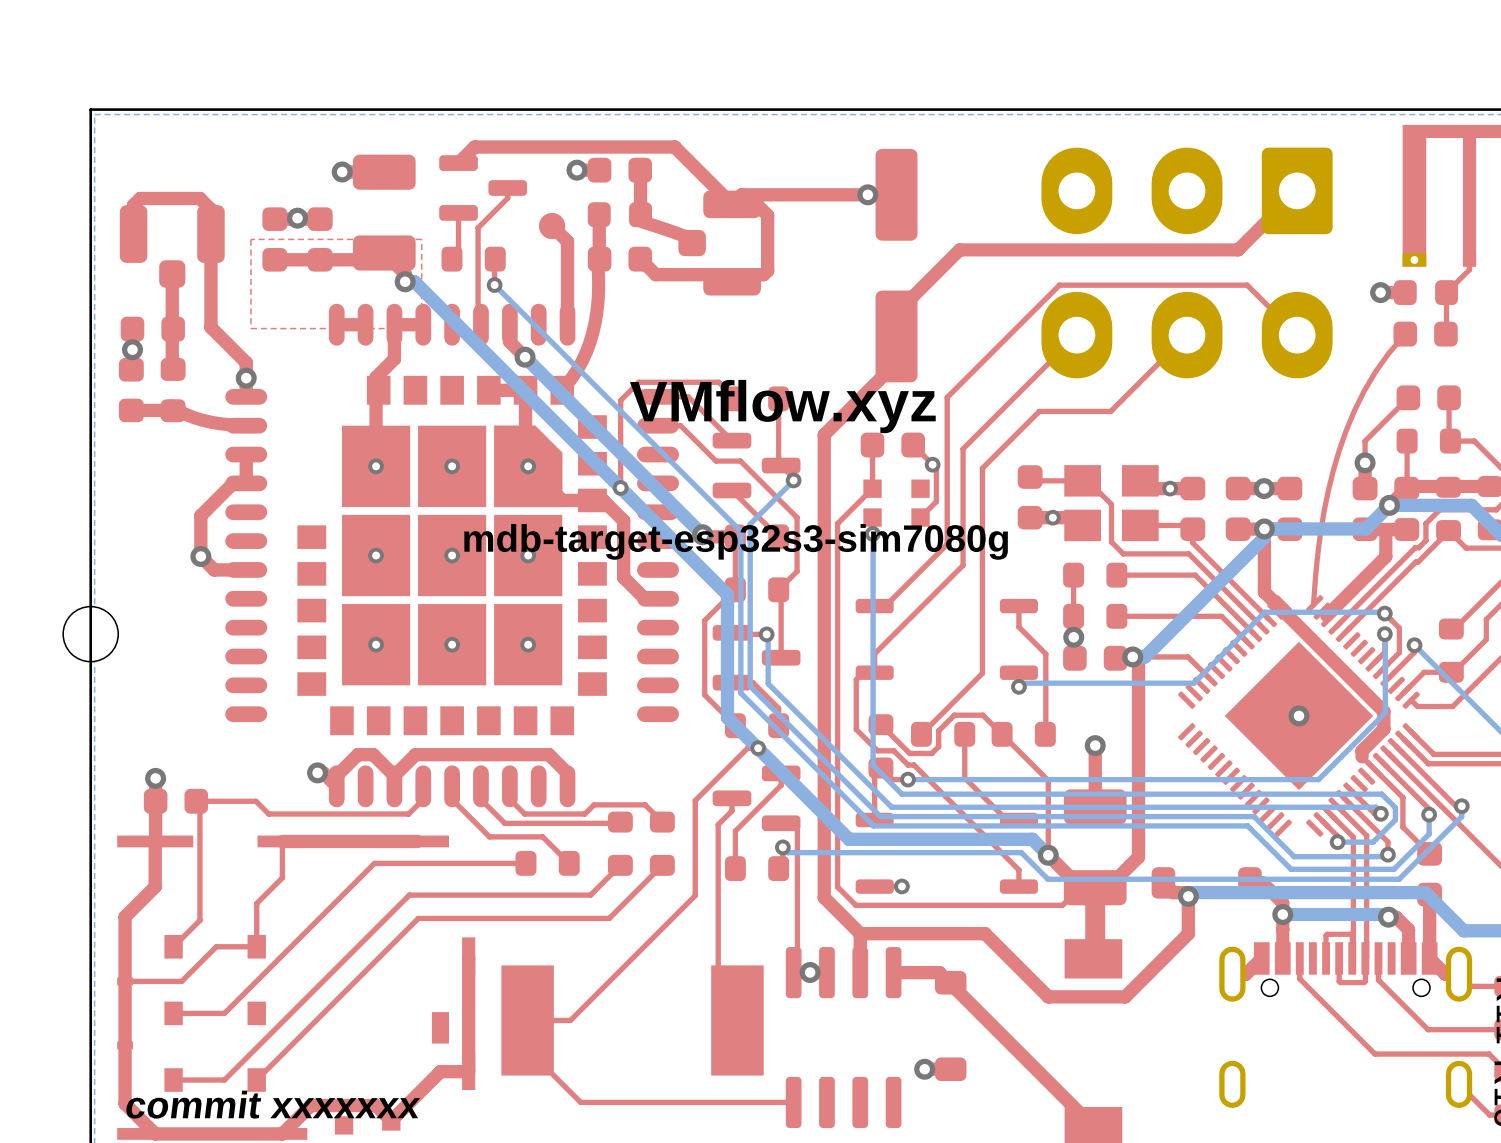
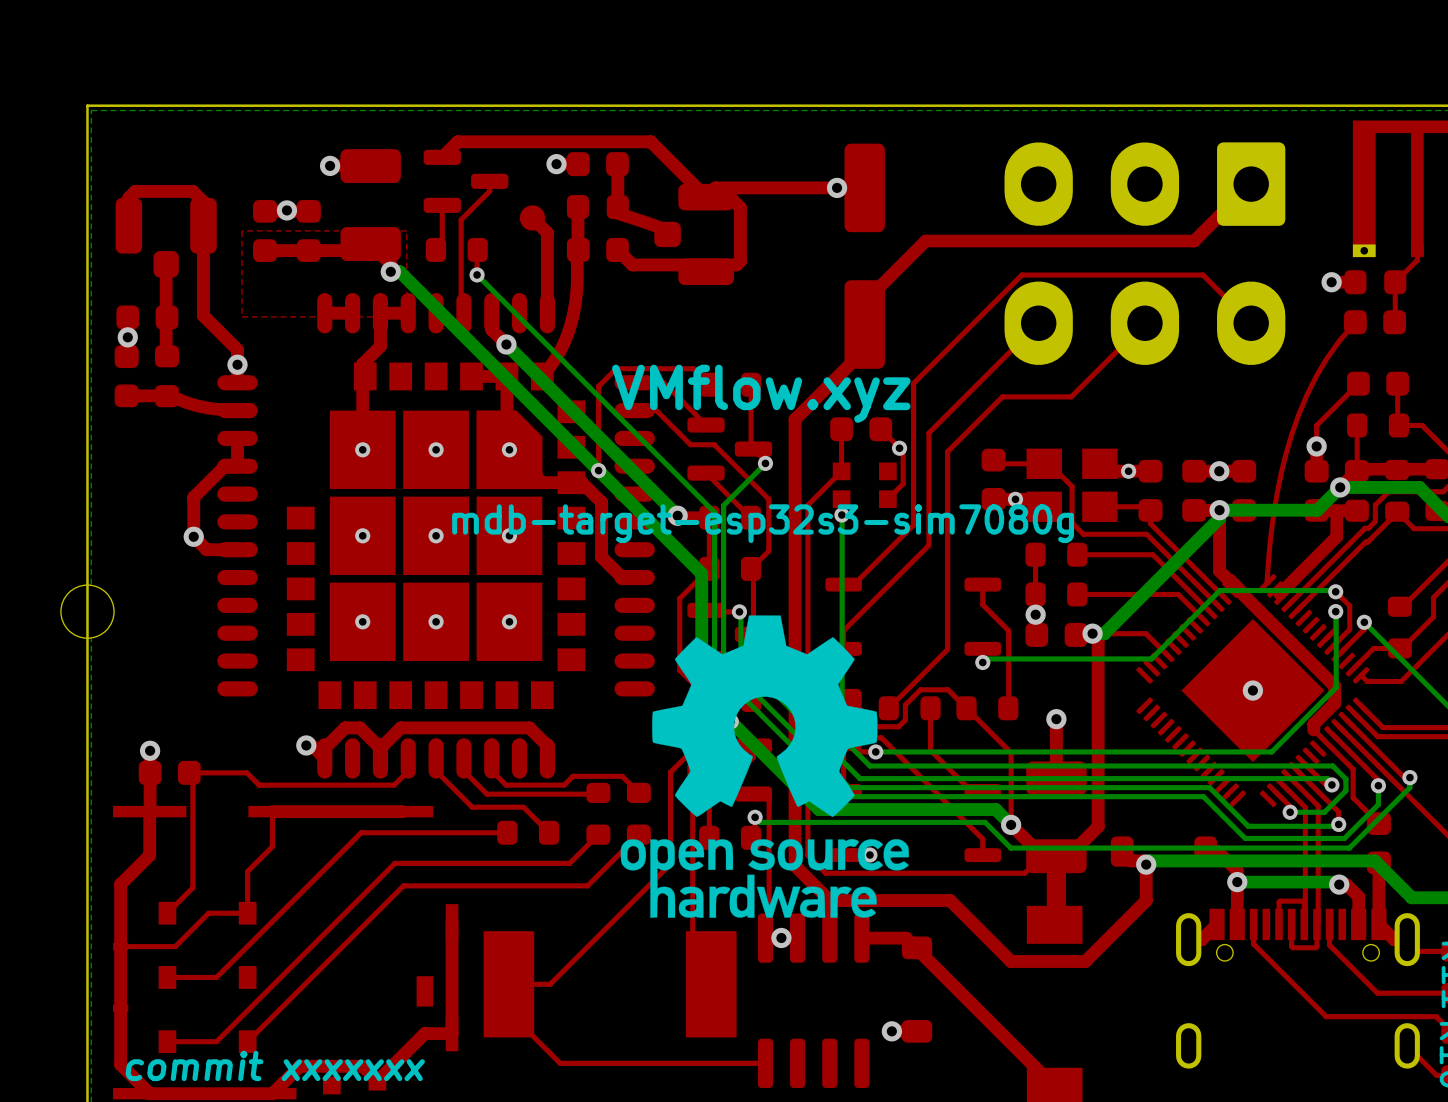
drawing: none -> [620, 615, 909, 918]

